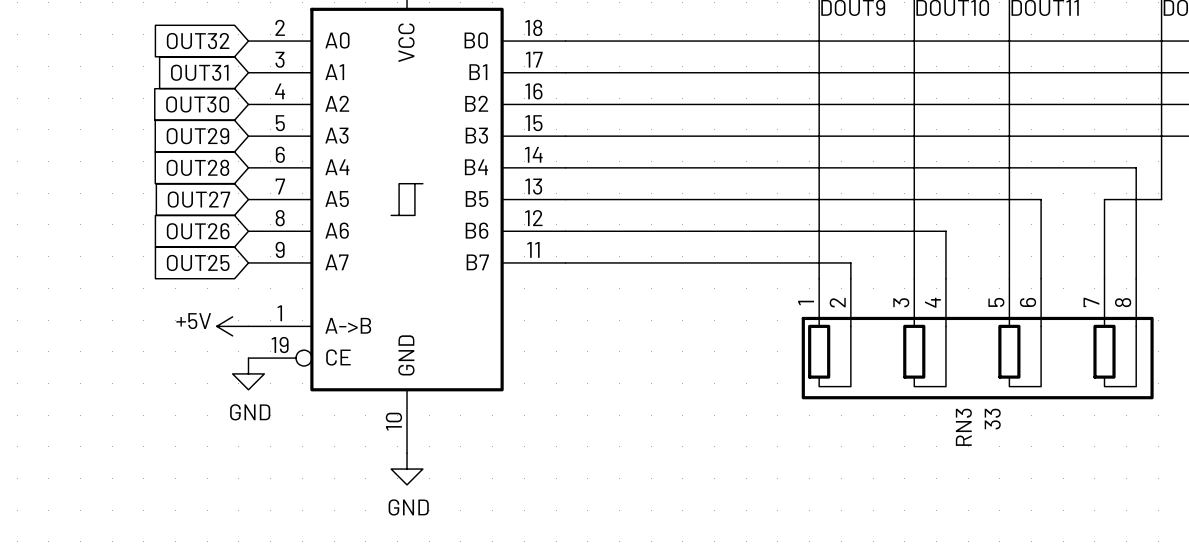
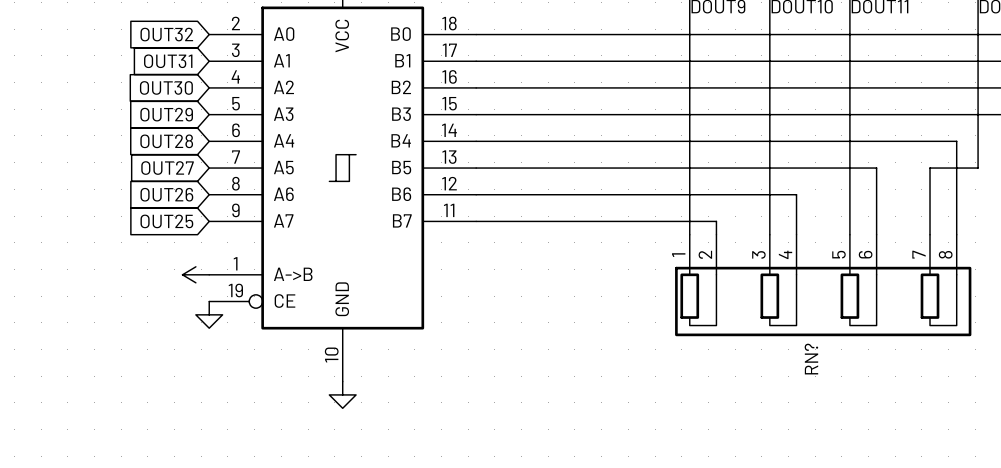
power symbol text: +5V (193, 321) -> none
power symbol text: GND (250, 412) -> none
RN3 value: 33 (992, 419) -> none
RN3 name: RN3 (963, 427) -> RN? (811, 359)
power symbol text: GND (408, 507) -> none

